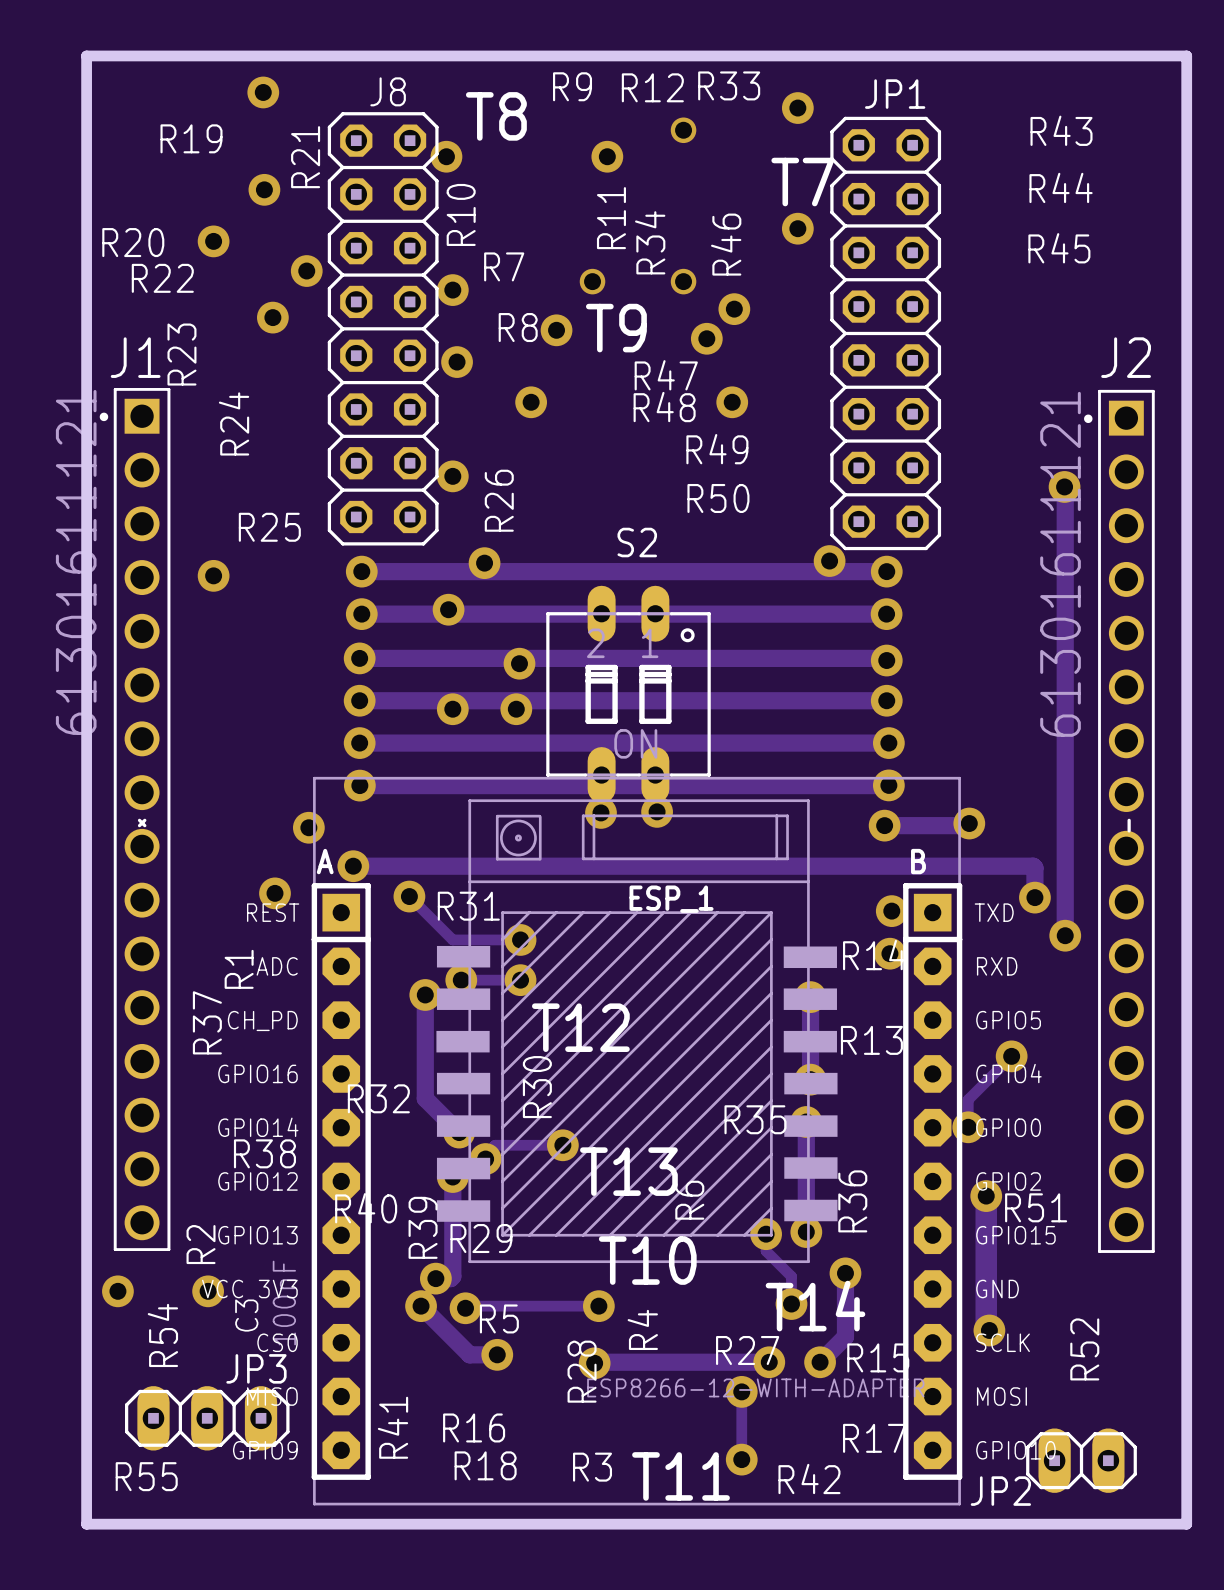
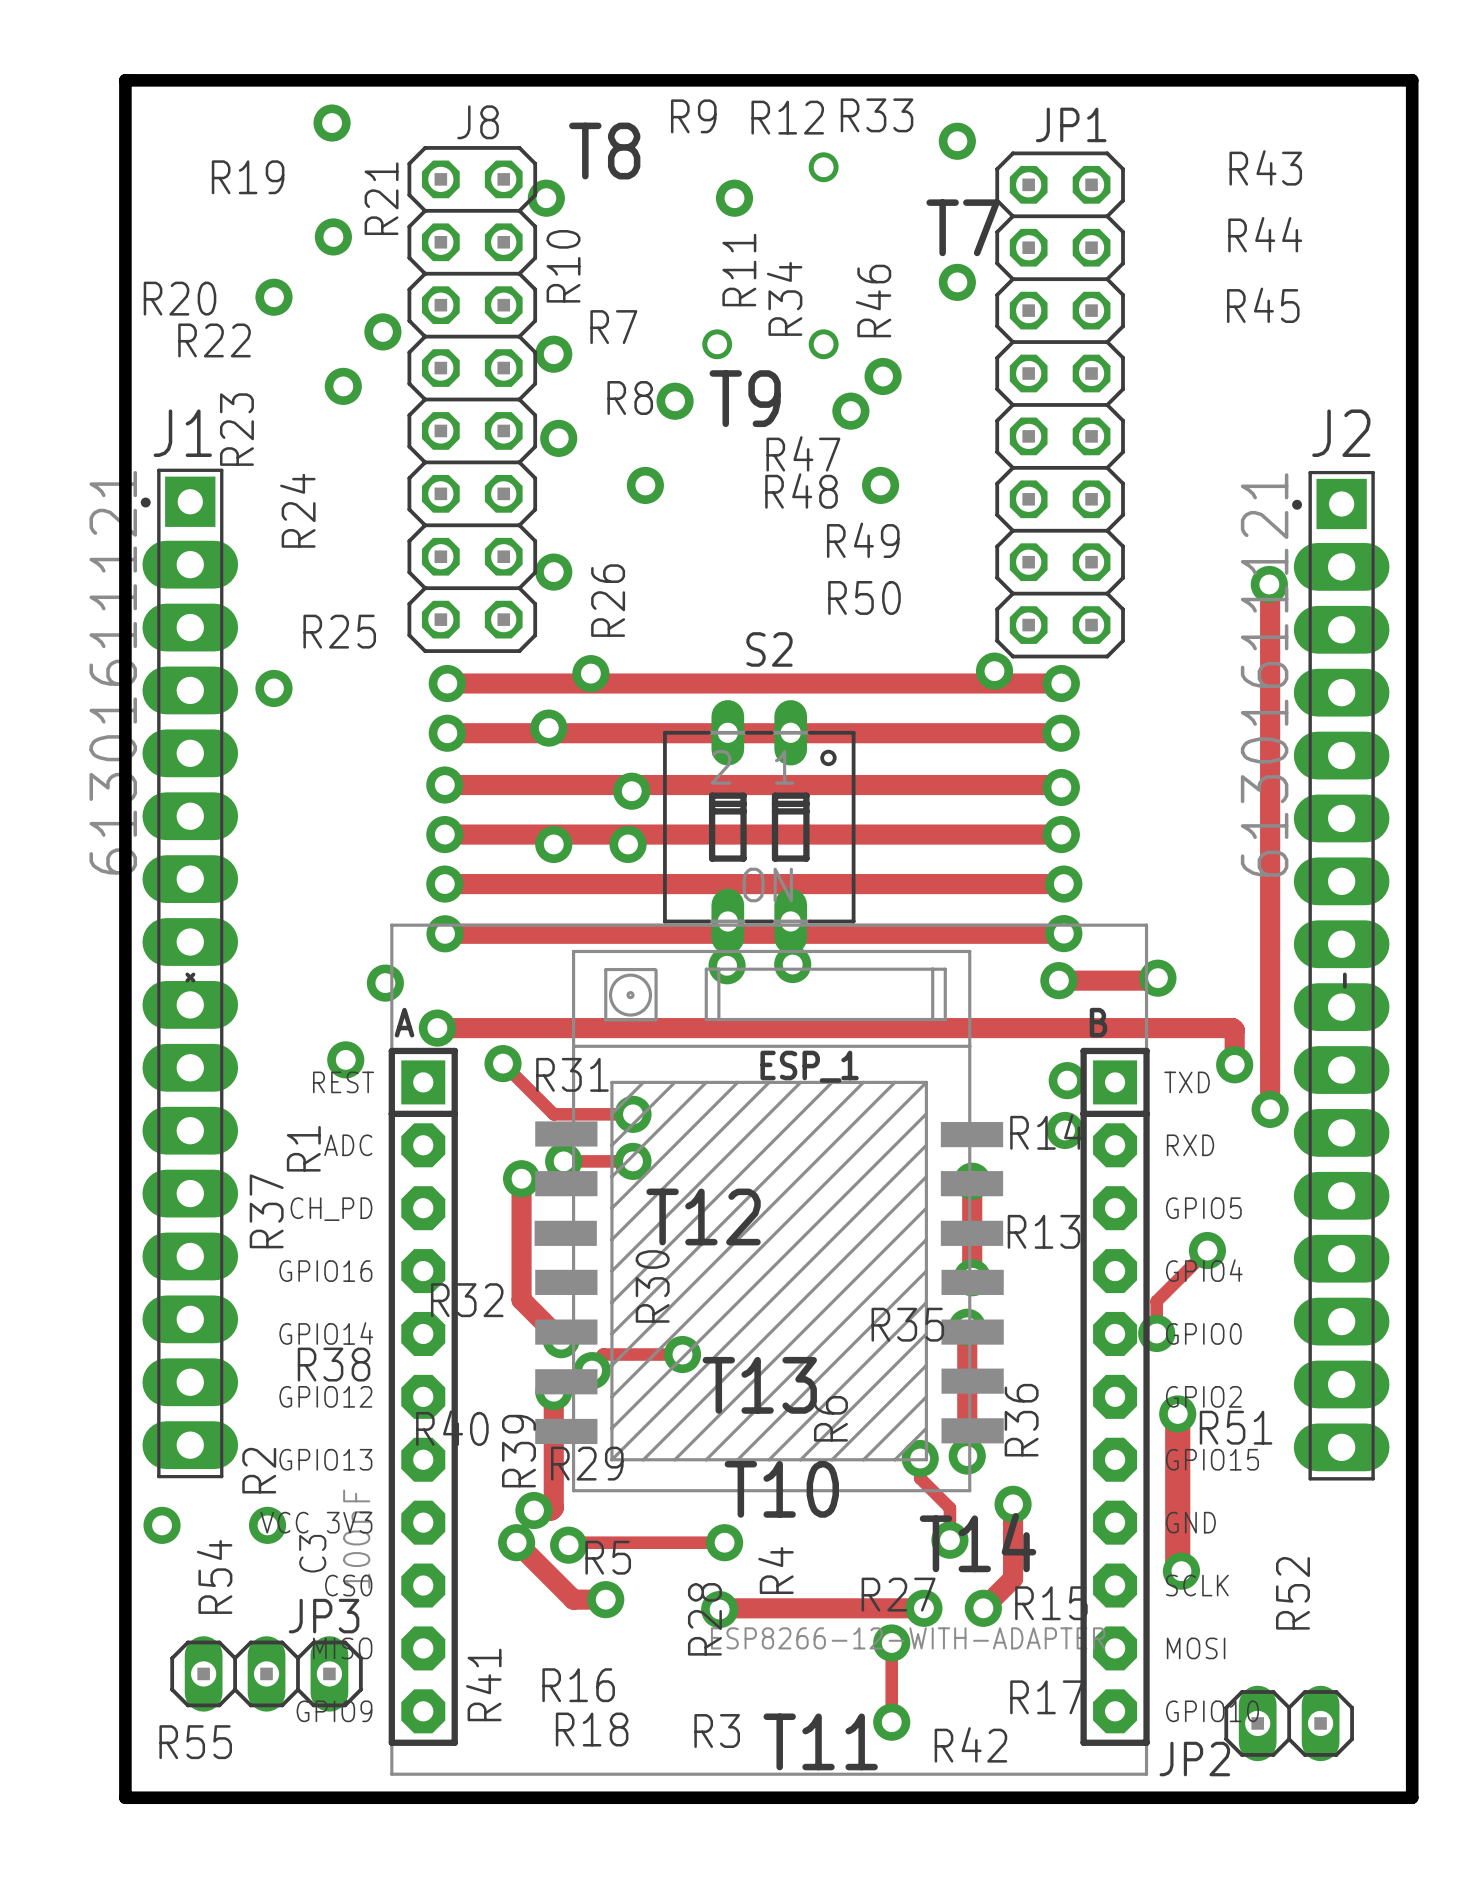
J1 footprint: [99, 388, 171, 1251] -> [140, 468, 239, 1479]
J2 footprint: [1084, 389, 1155, 1253] -> [1292, 470, 1390, 1481]

